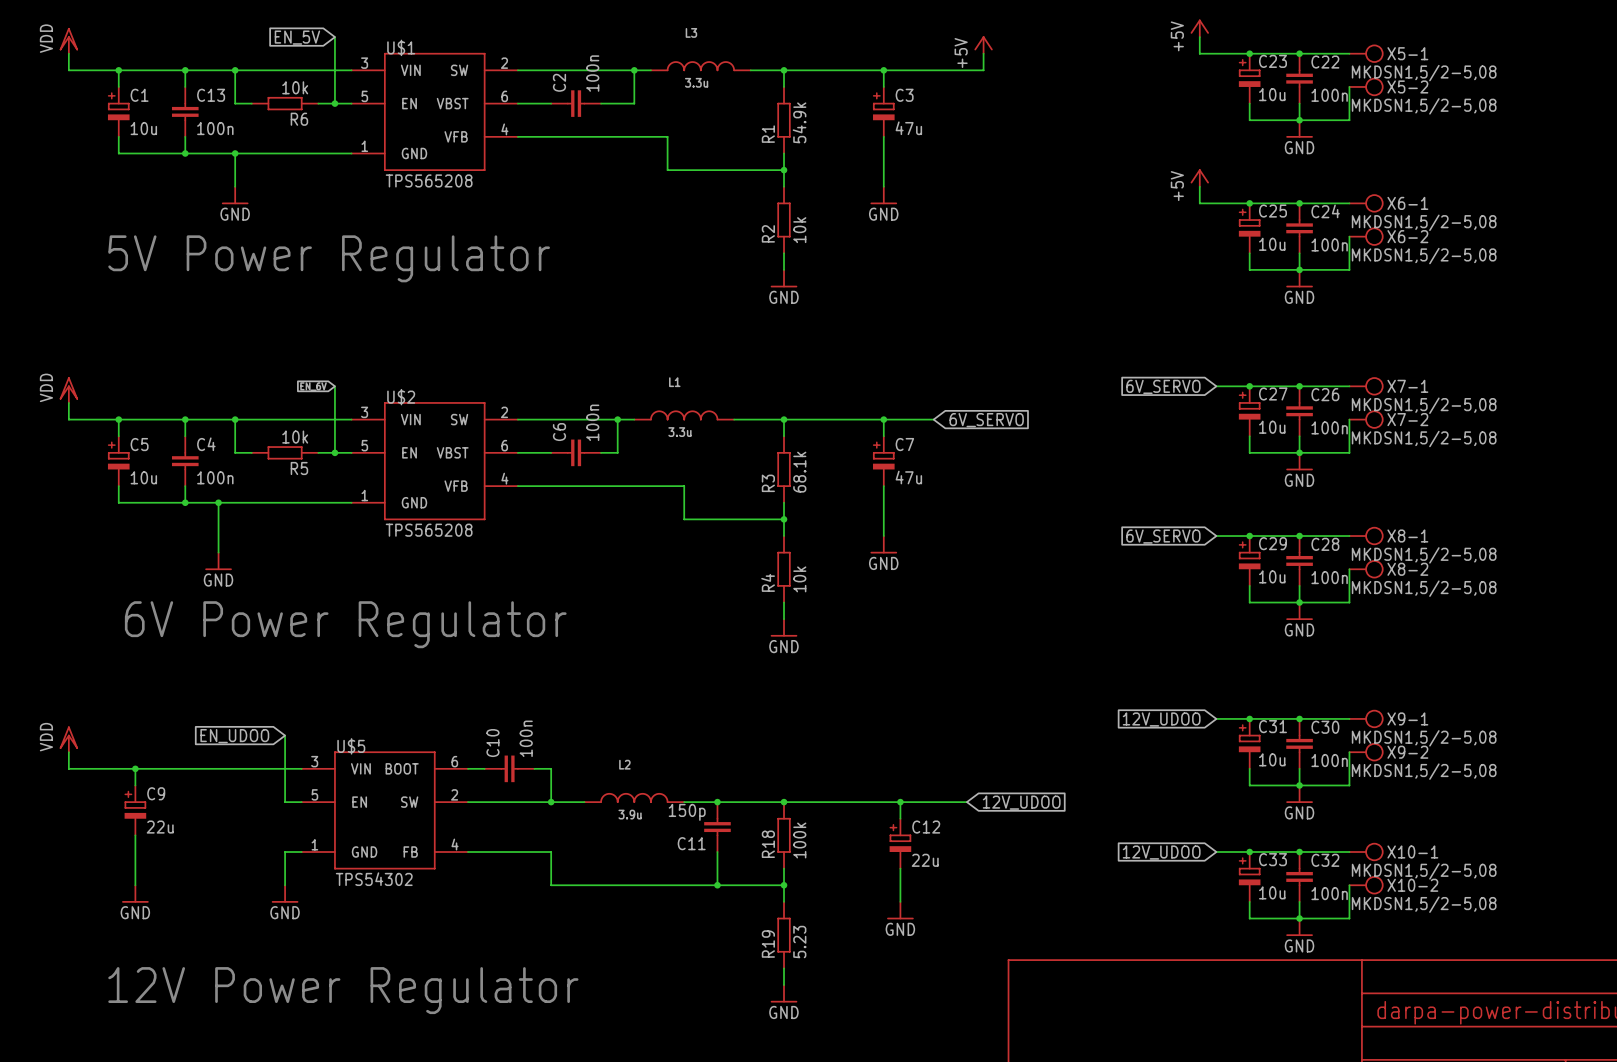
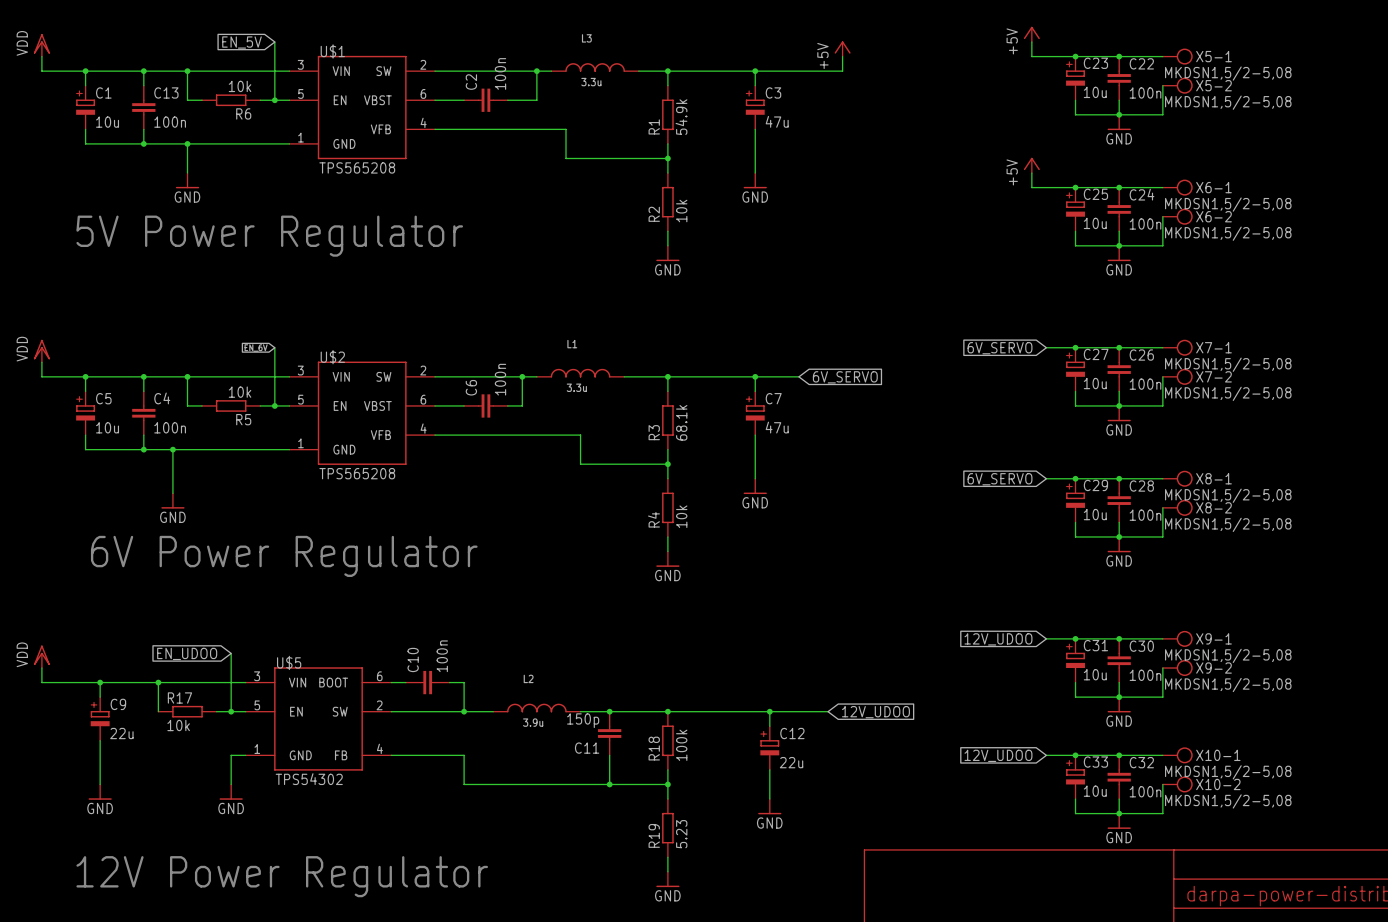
wire: none -> (158, 682) (158, 711)
junction: none -> (158, 682)
R17: none -> 10k (187, 711)
wire: none -> (216, 711) (231, 711)
junction: none -> (231, 711)

